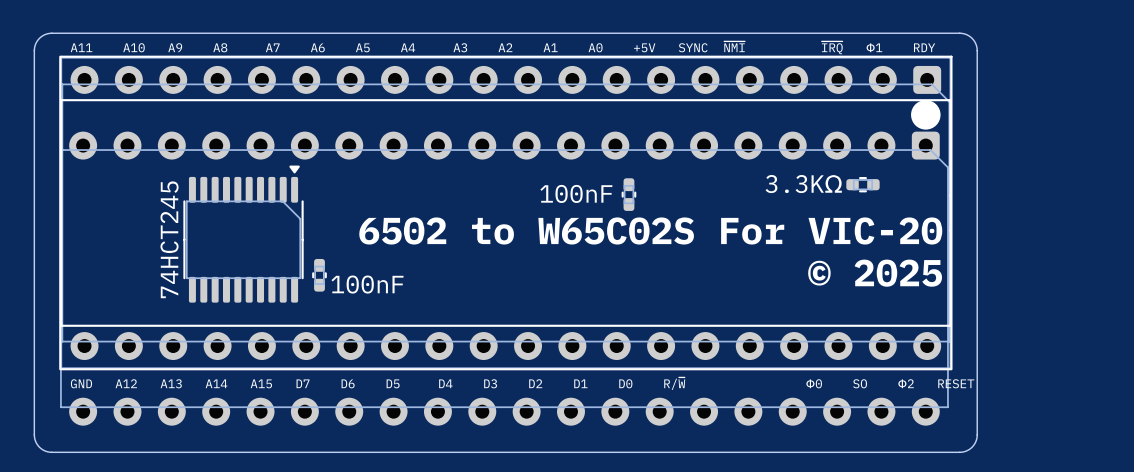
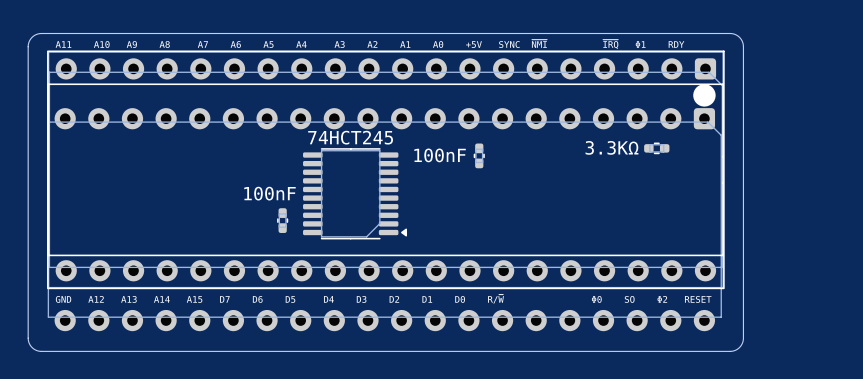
text: 6502 to W65C02S For VIC-20 (650, 230) -> none
part rotation: 0° (243, 234) -> 90° clockwise (355, 193)
part position: (243, 234) -> (355, 193)
text: © 2025 (875, 273) -> none
part position: (319, 275) -> (282, 220)
part value position: 100nF (367, 284) -> 100nF (269, 193)

